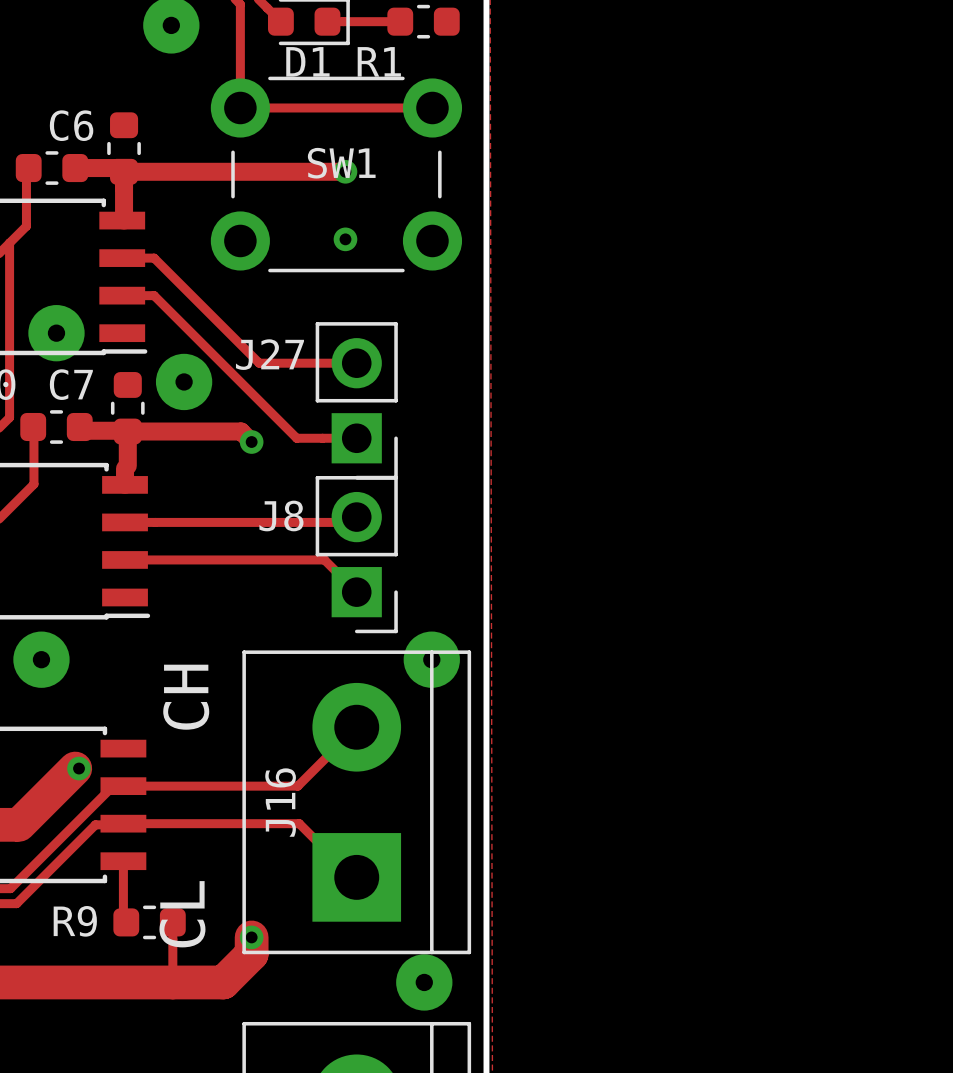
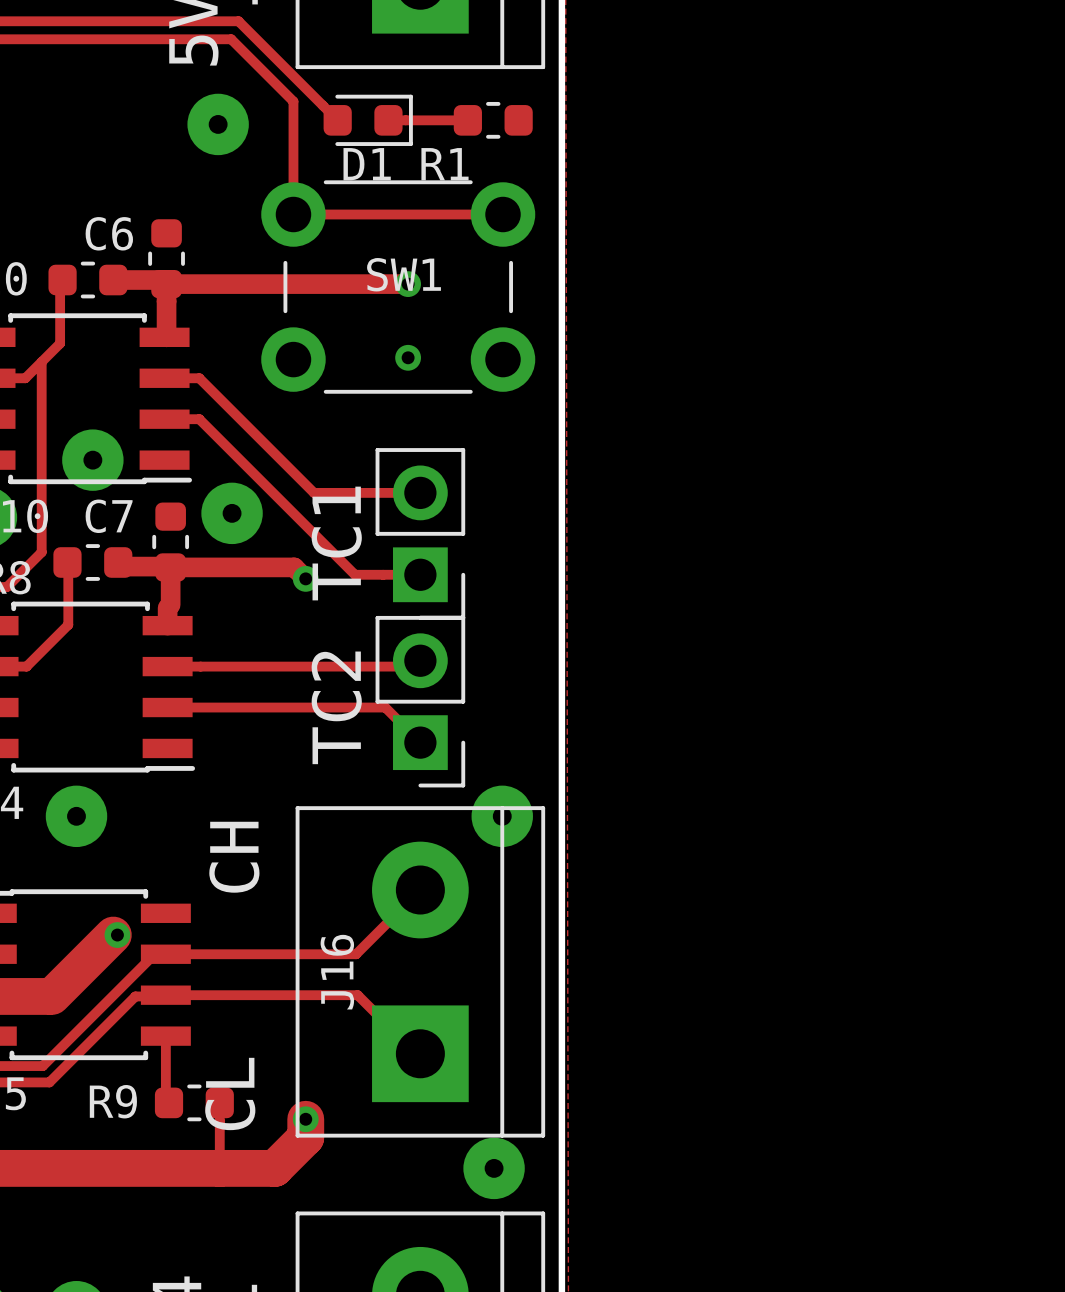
J27 name: J27 (269, 354) -> none
text: none -> TC1 (336, 543)
J8 name: J8 (281, 515) -> none
text: none -> TC2 (336, 707)

